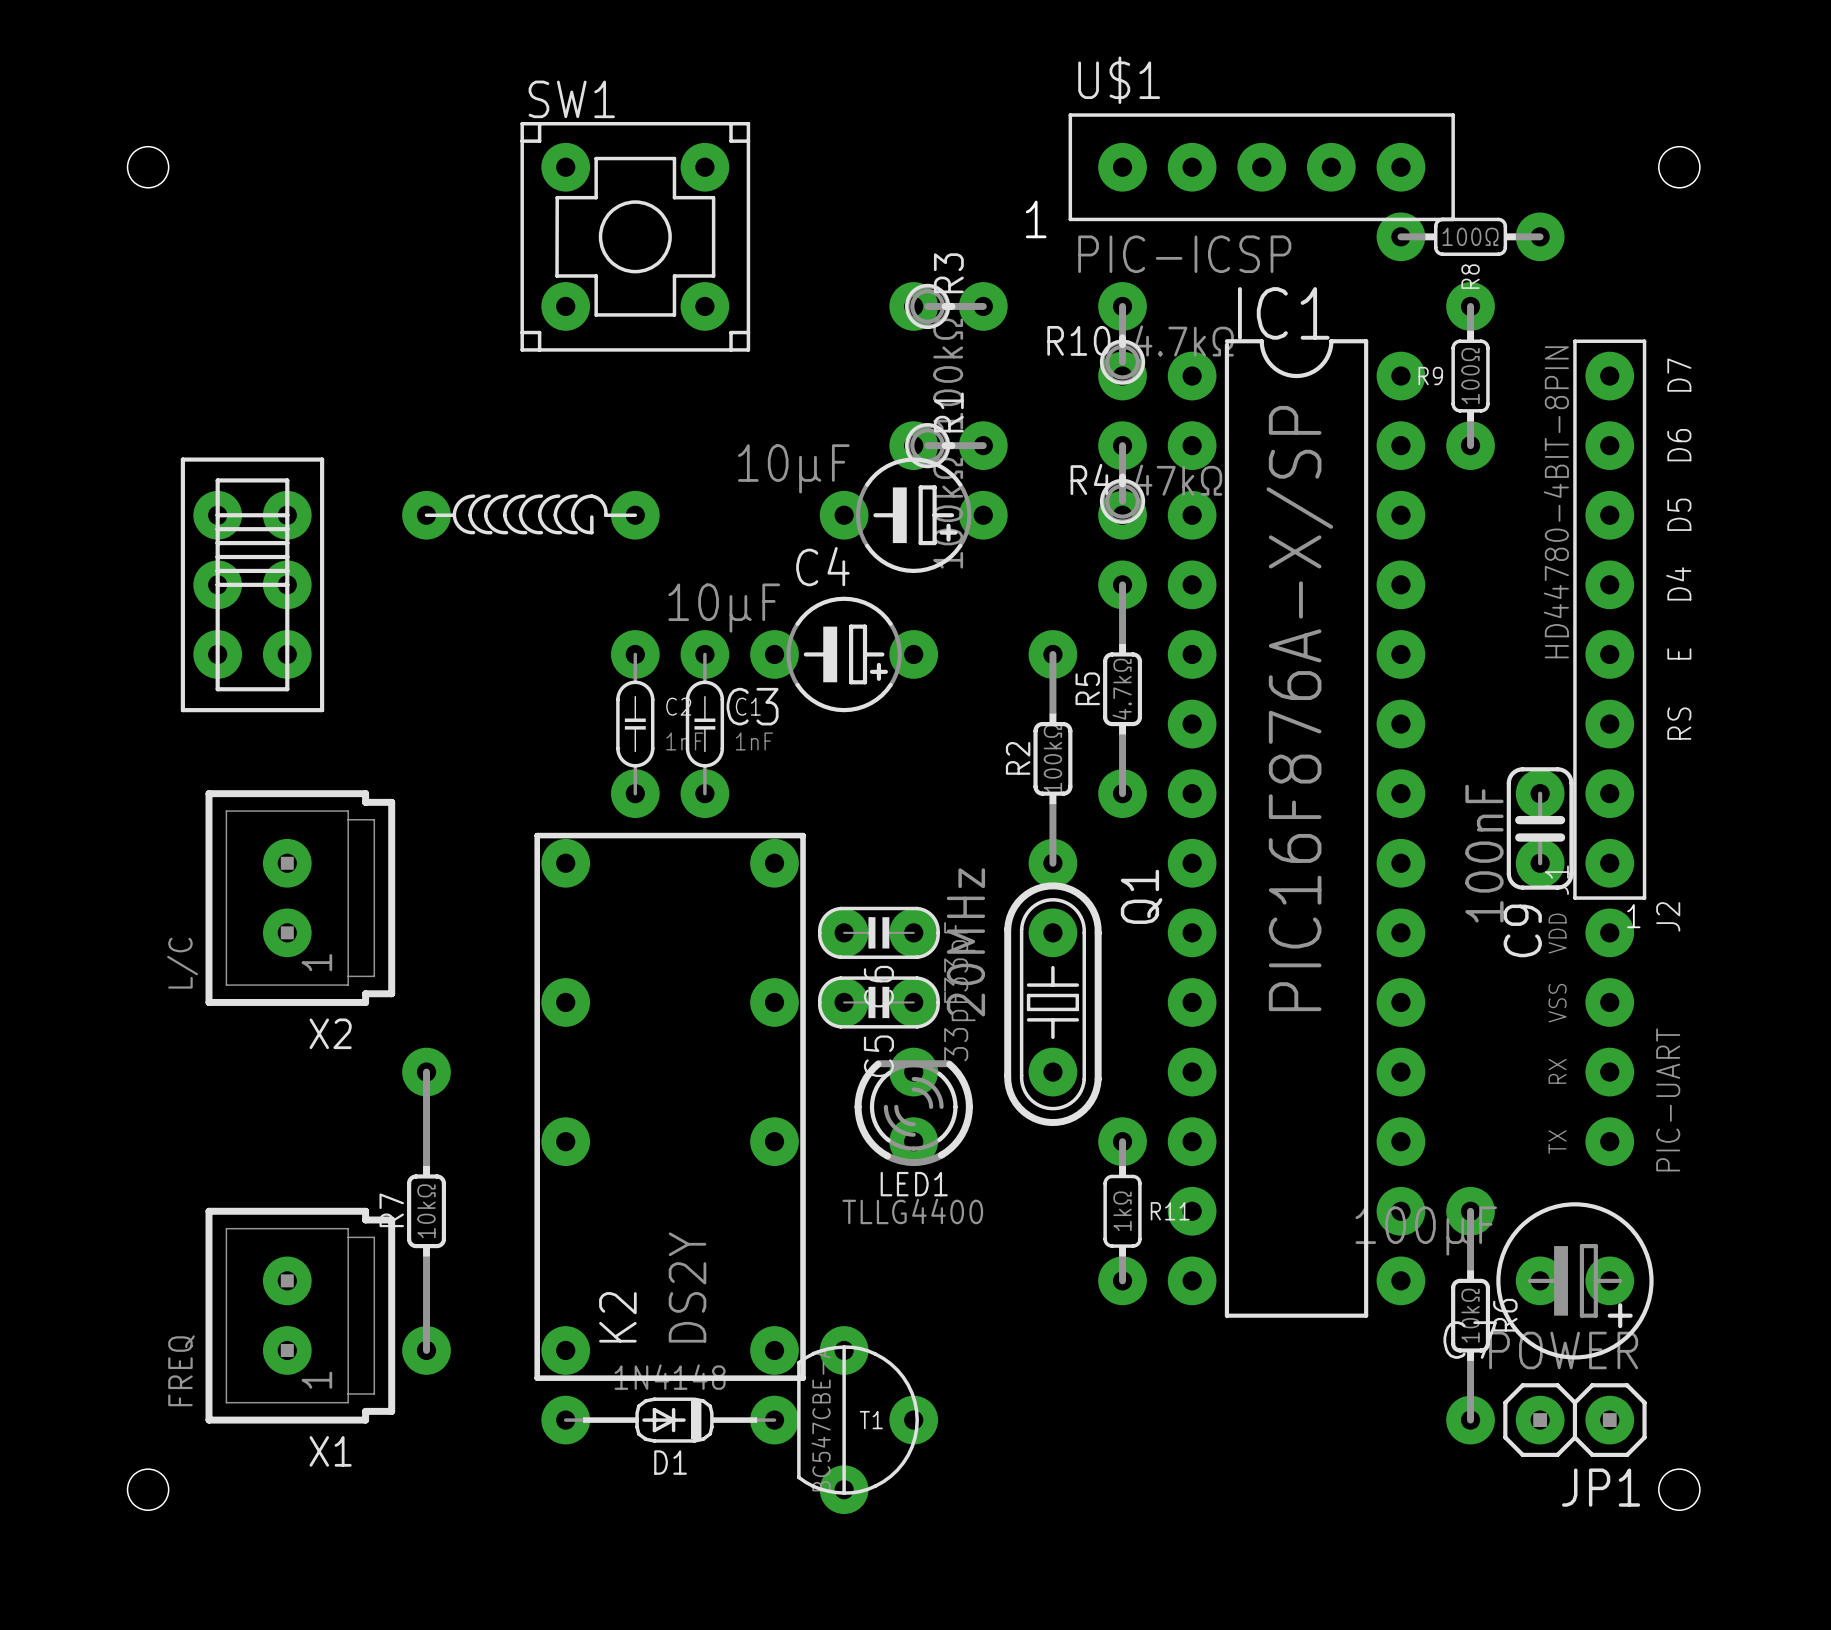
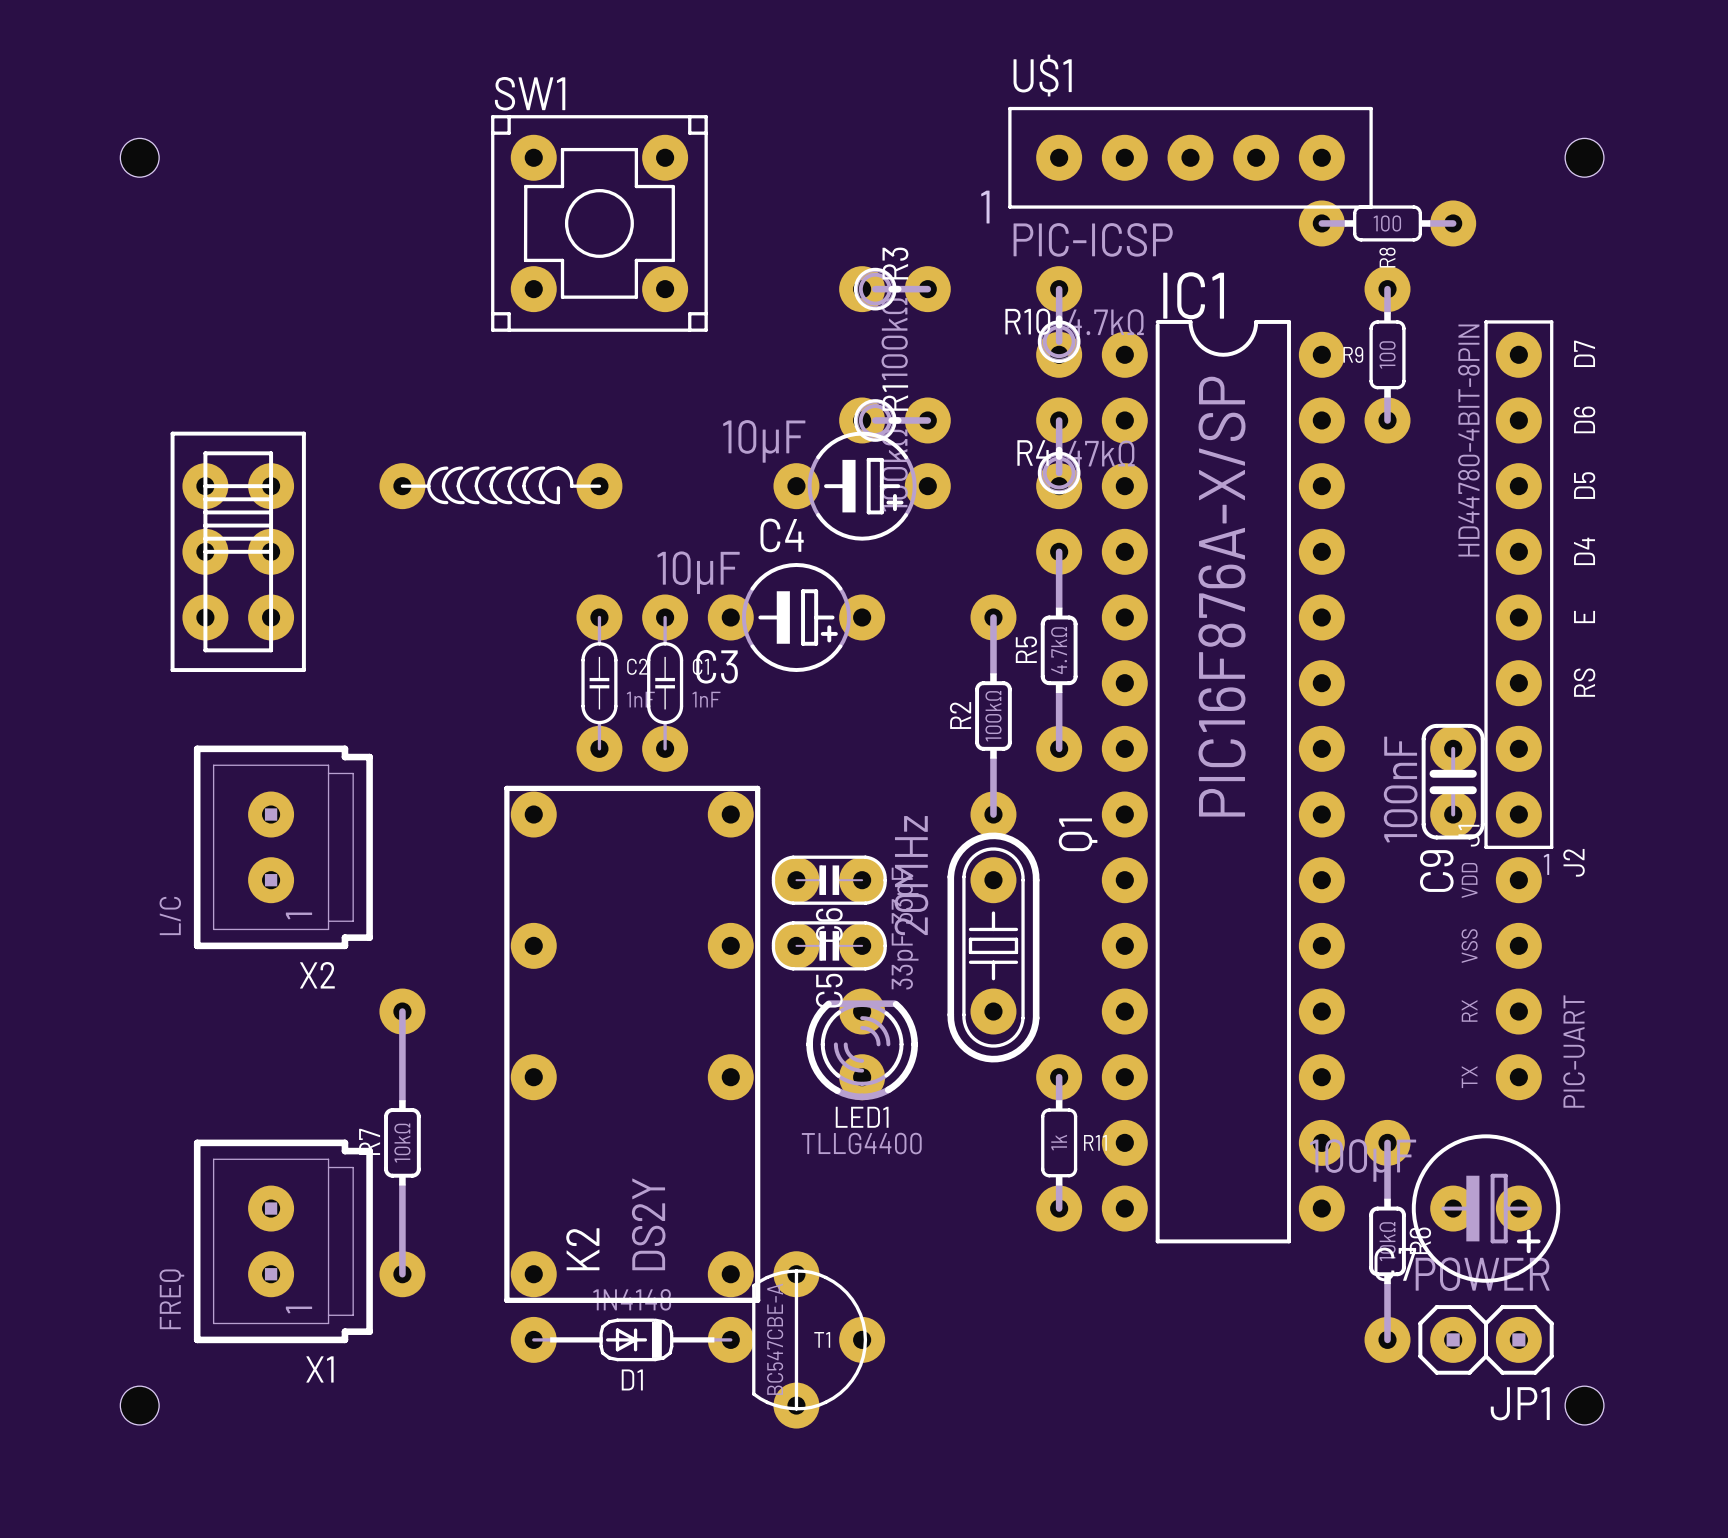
R8 value: 100Ω (1470, 236) -> 100 (1387, 223)
R9 value: 100Ω (1470, 376) -> 100 (1387, 354)
R11 value: 1kΩ (1122, 1211) -> 1k (1059, 1142)

